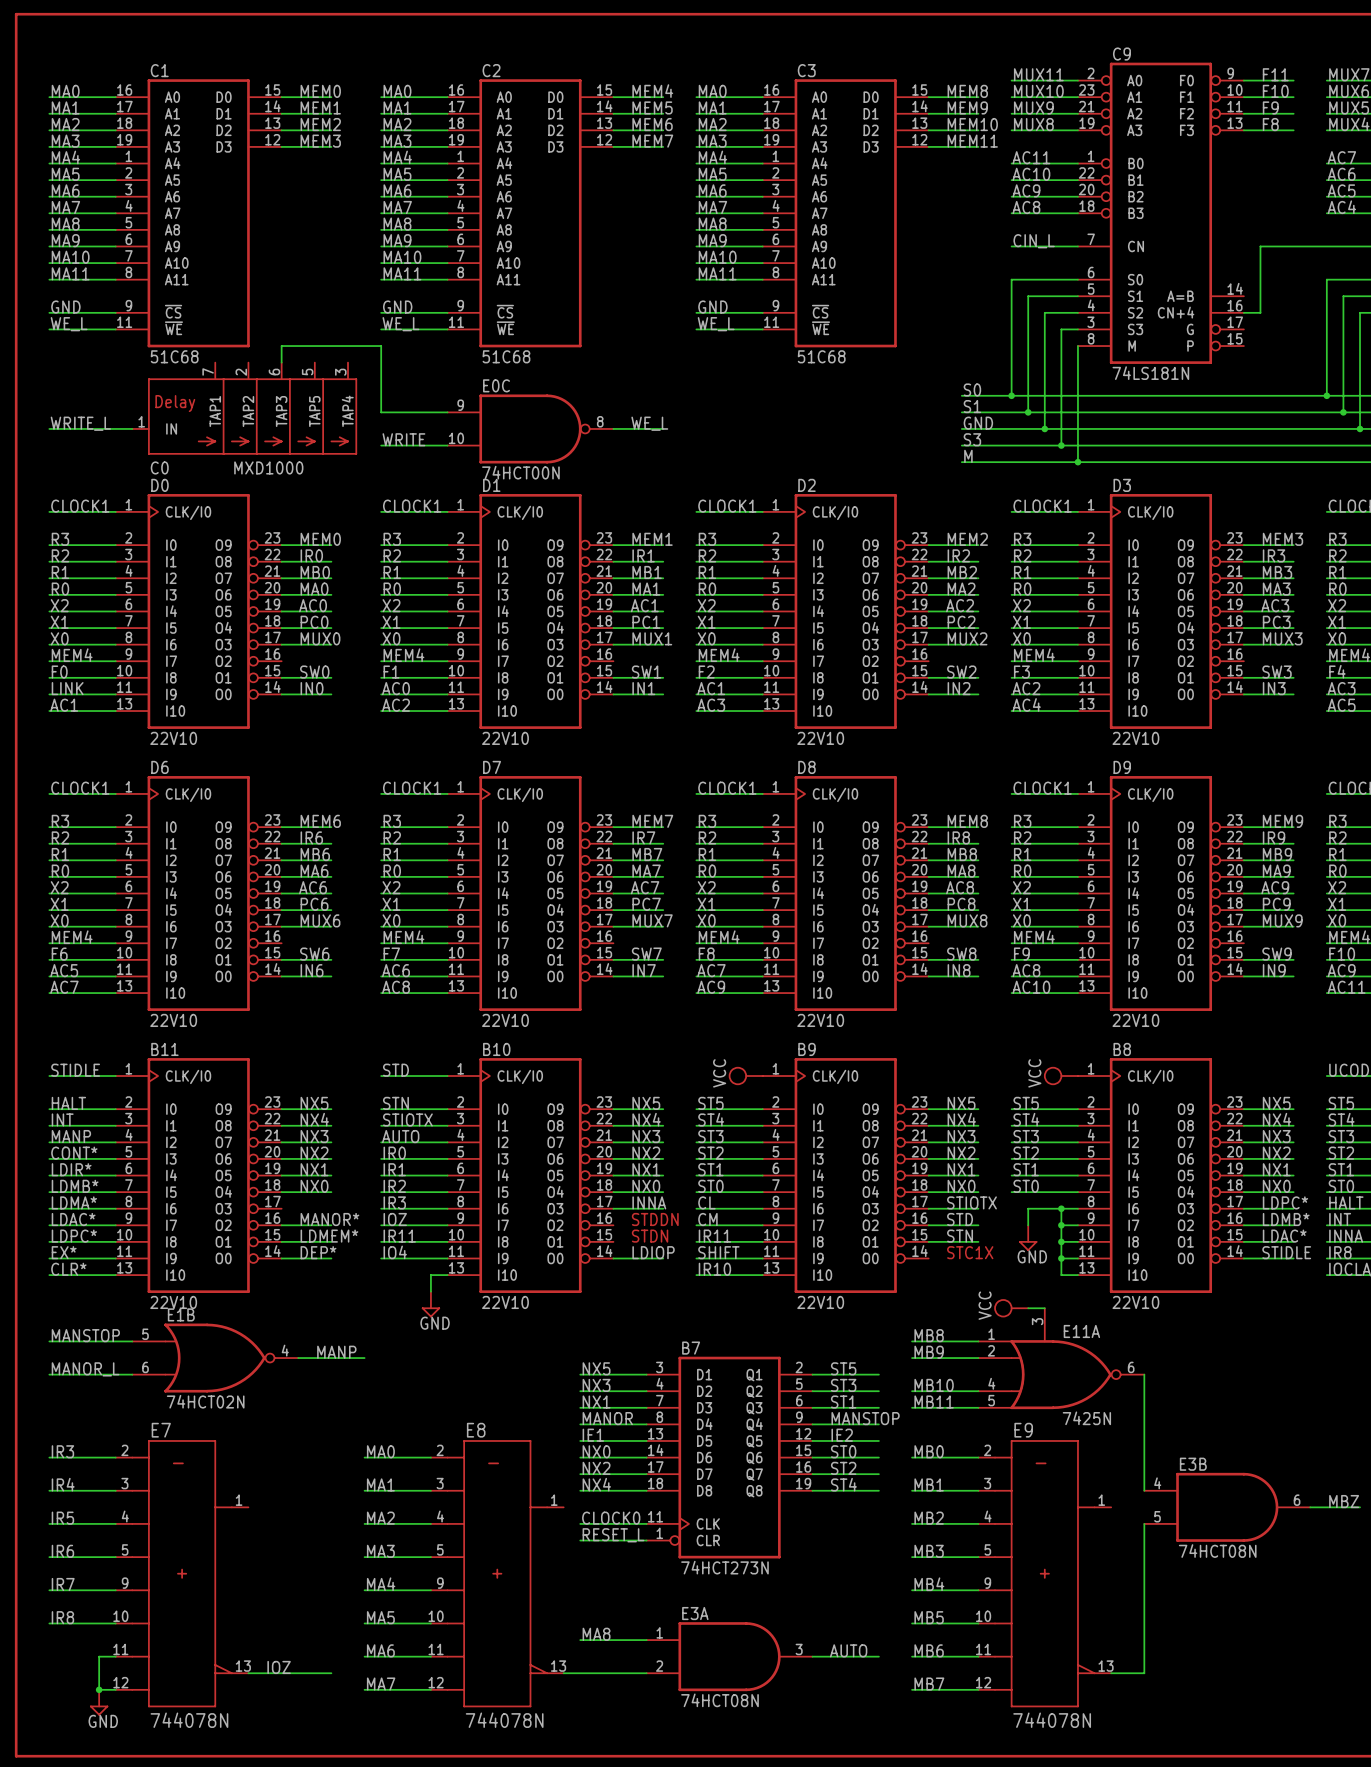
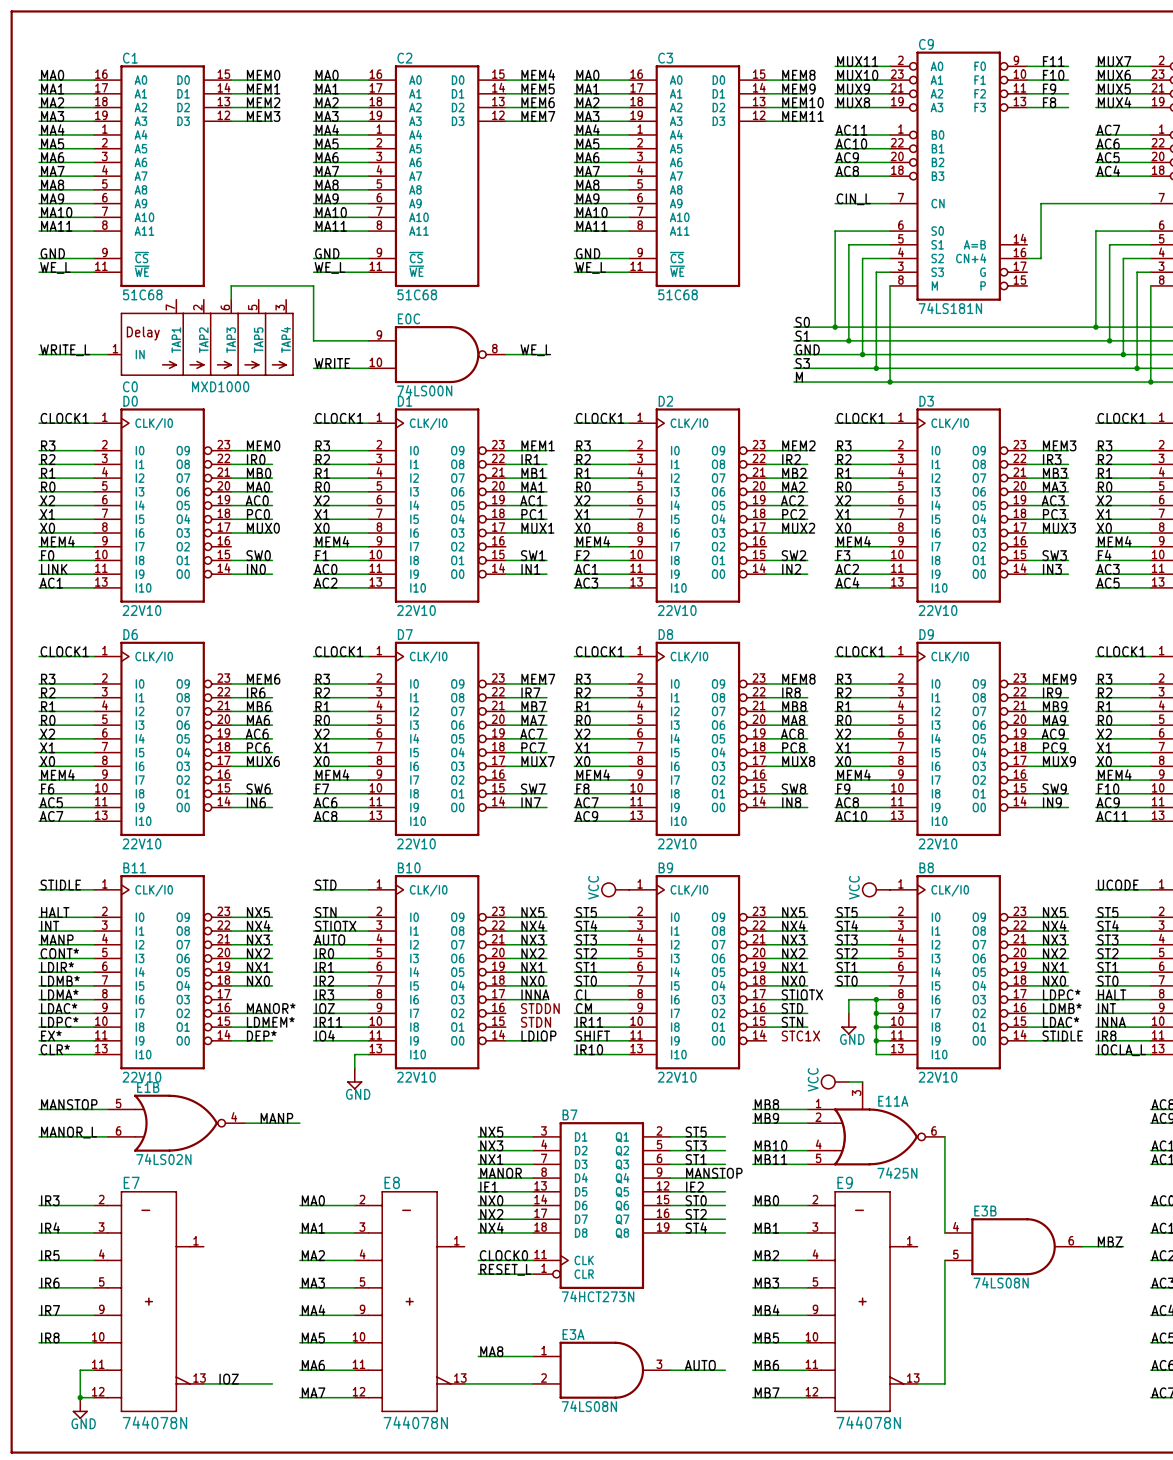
E0C value: 74HCT00N (520, 472) -> 74LS00N (424, 390)
E1B value: 74HCT02N (205, 1401) -> 74LS02N (163, 1159)
E3B value: 74HCT08N (1217, 1551) -> 74LS08N (1001, 1282)
E3A value: 74HCT08N (719, 1700) -> 74LS08N (589, 1406)

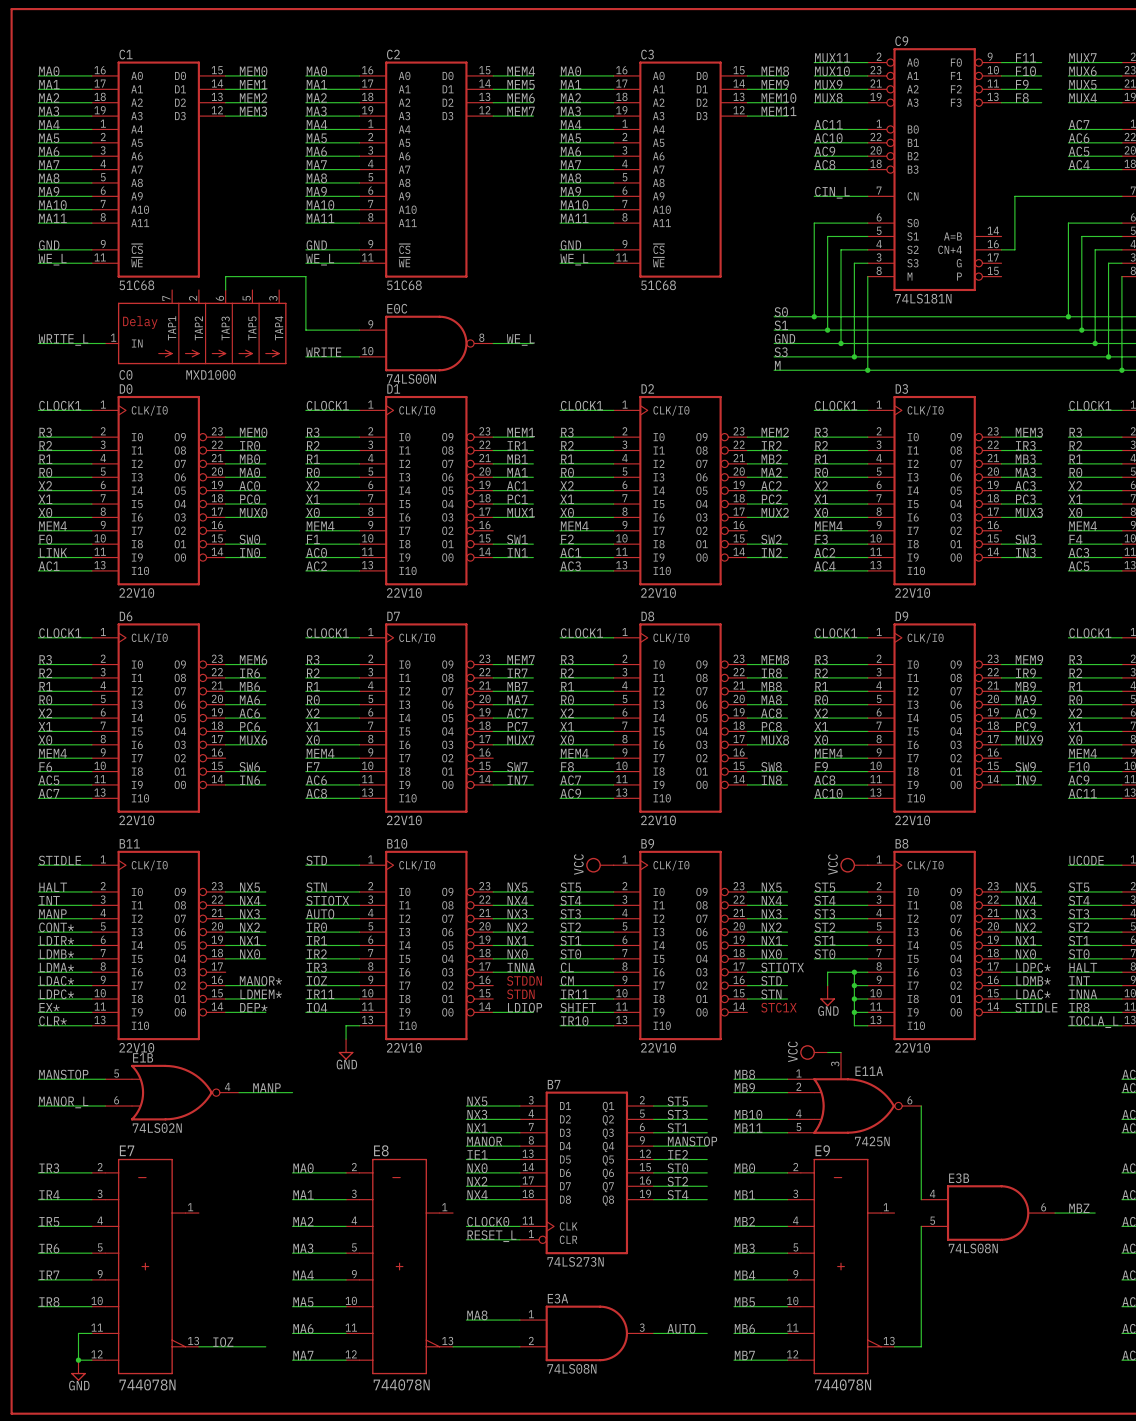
B7 value: 74HCT273N (598, 1296) -> 74LS273N (575, 1261)

